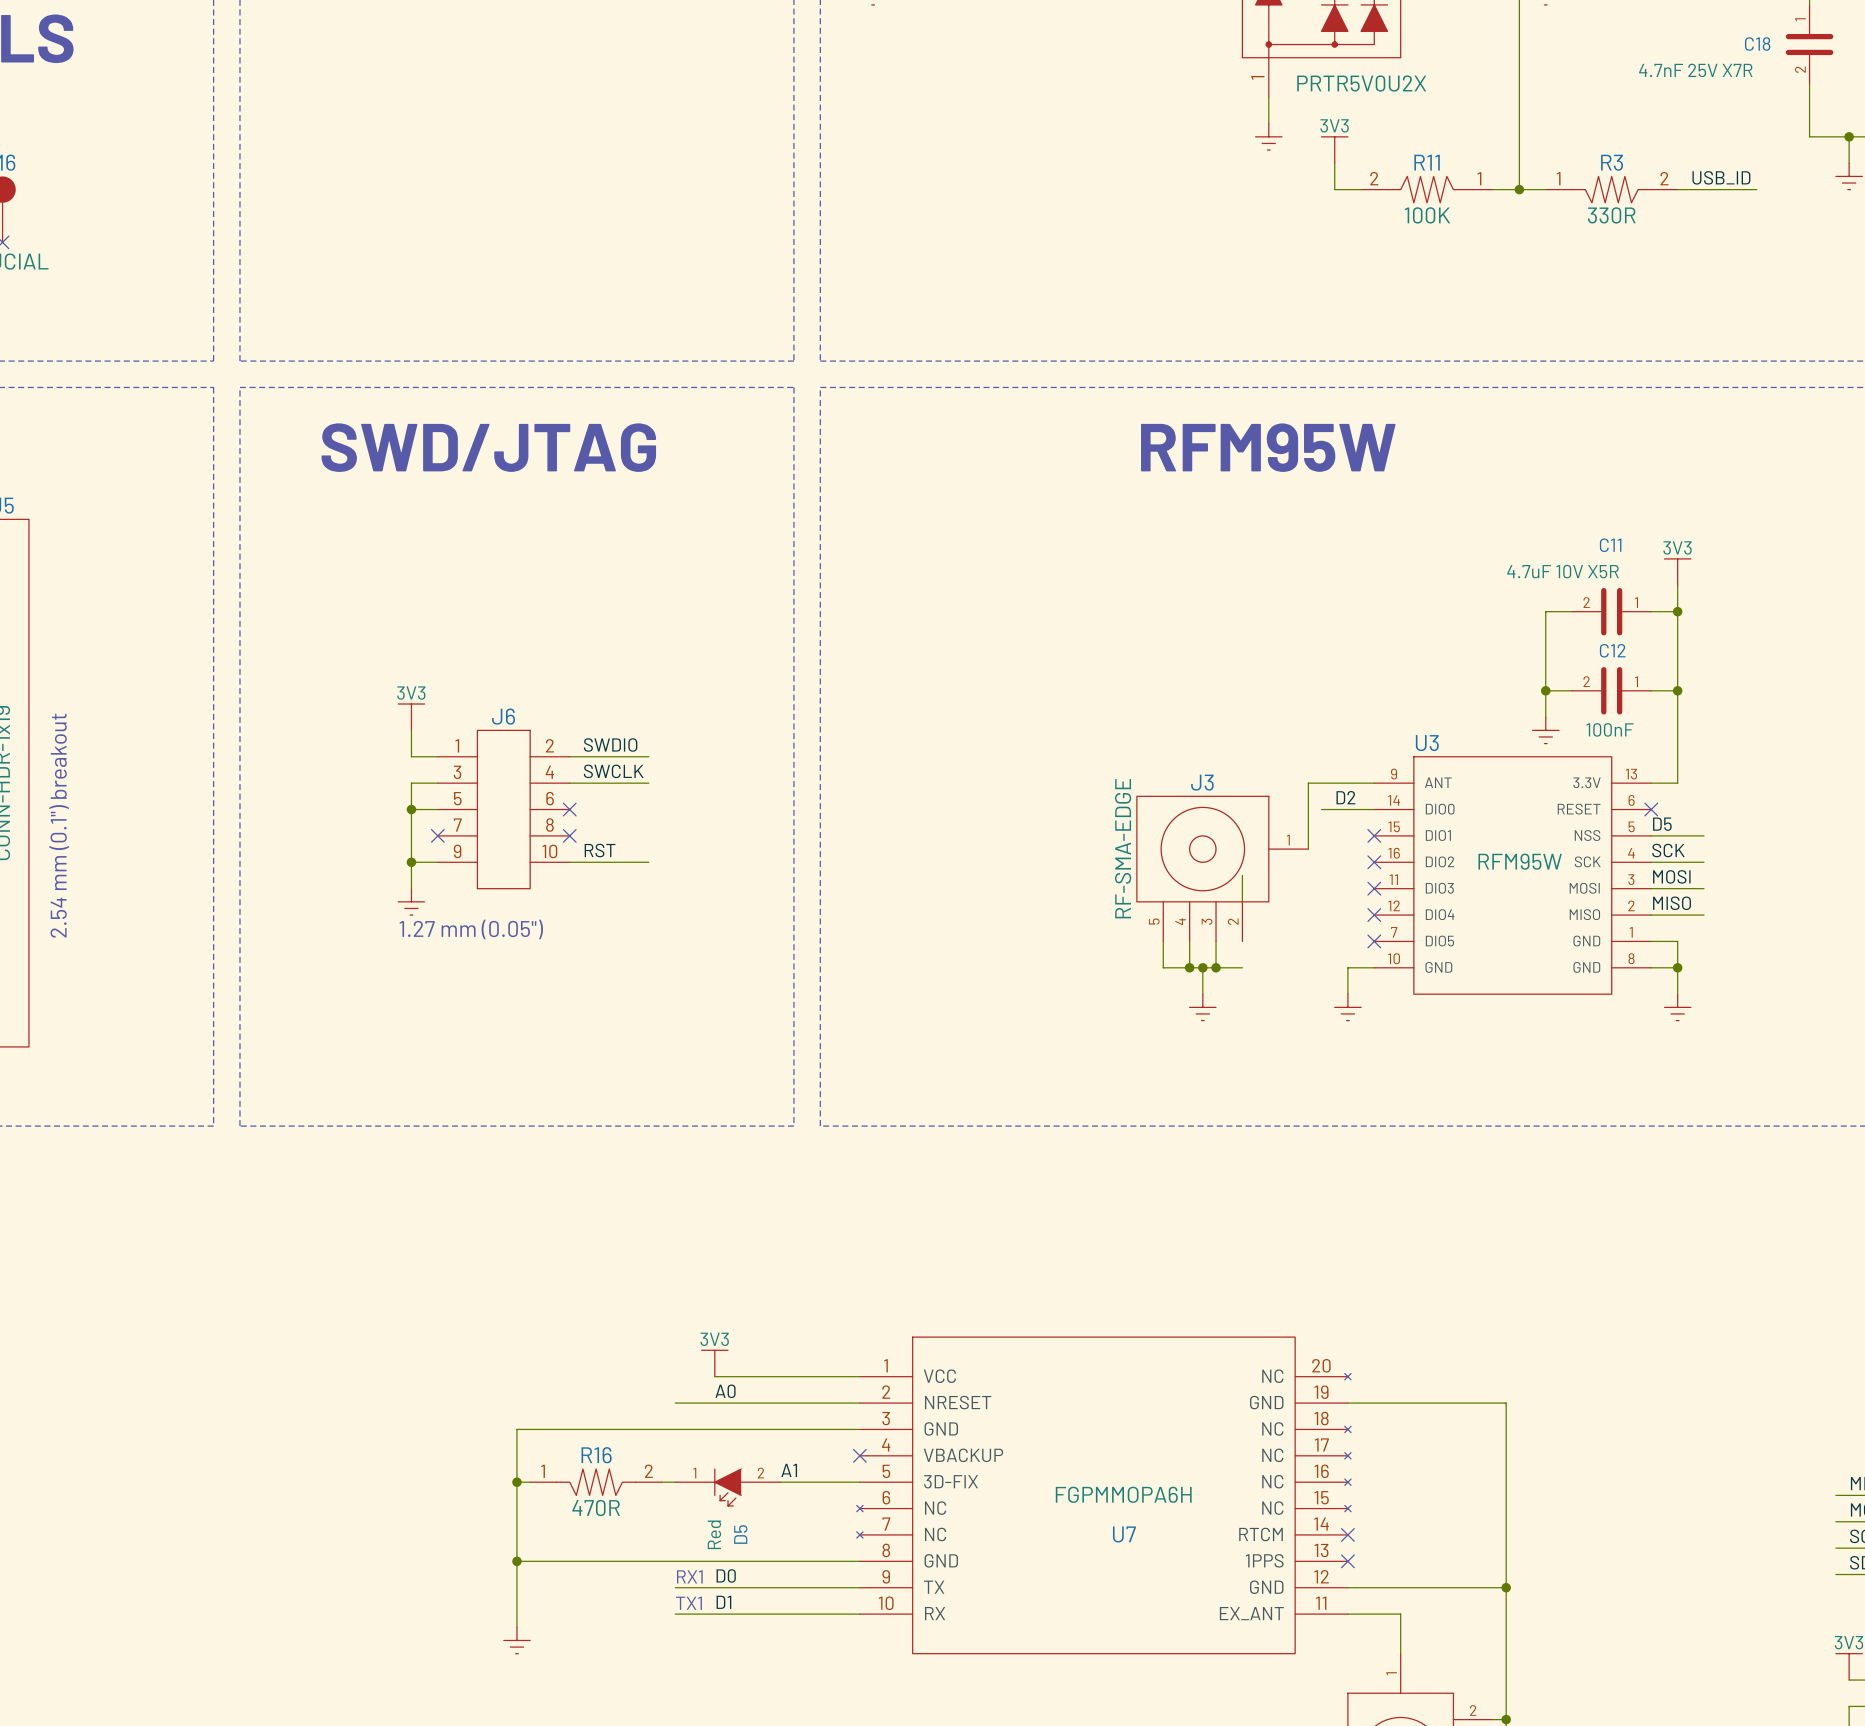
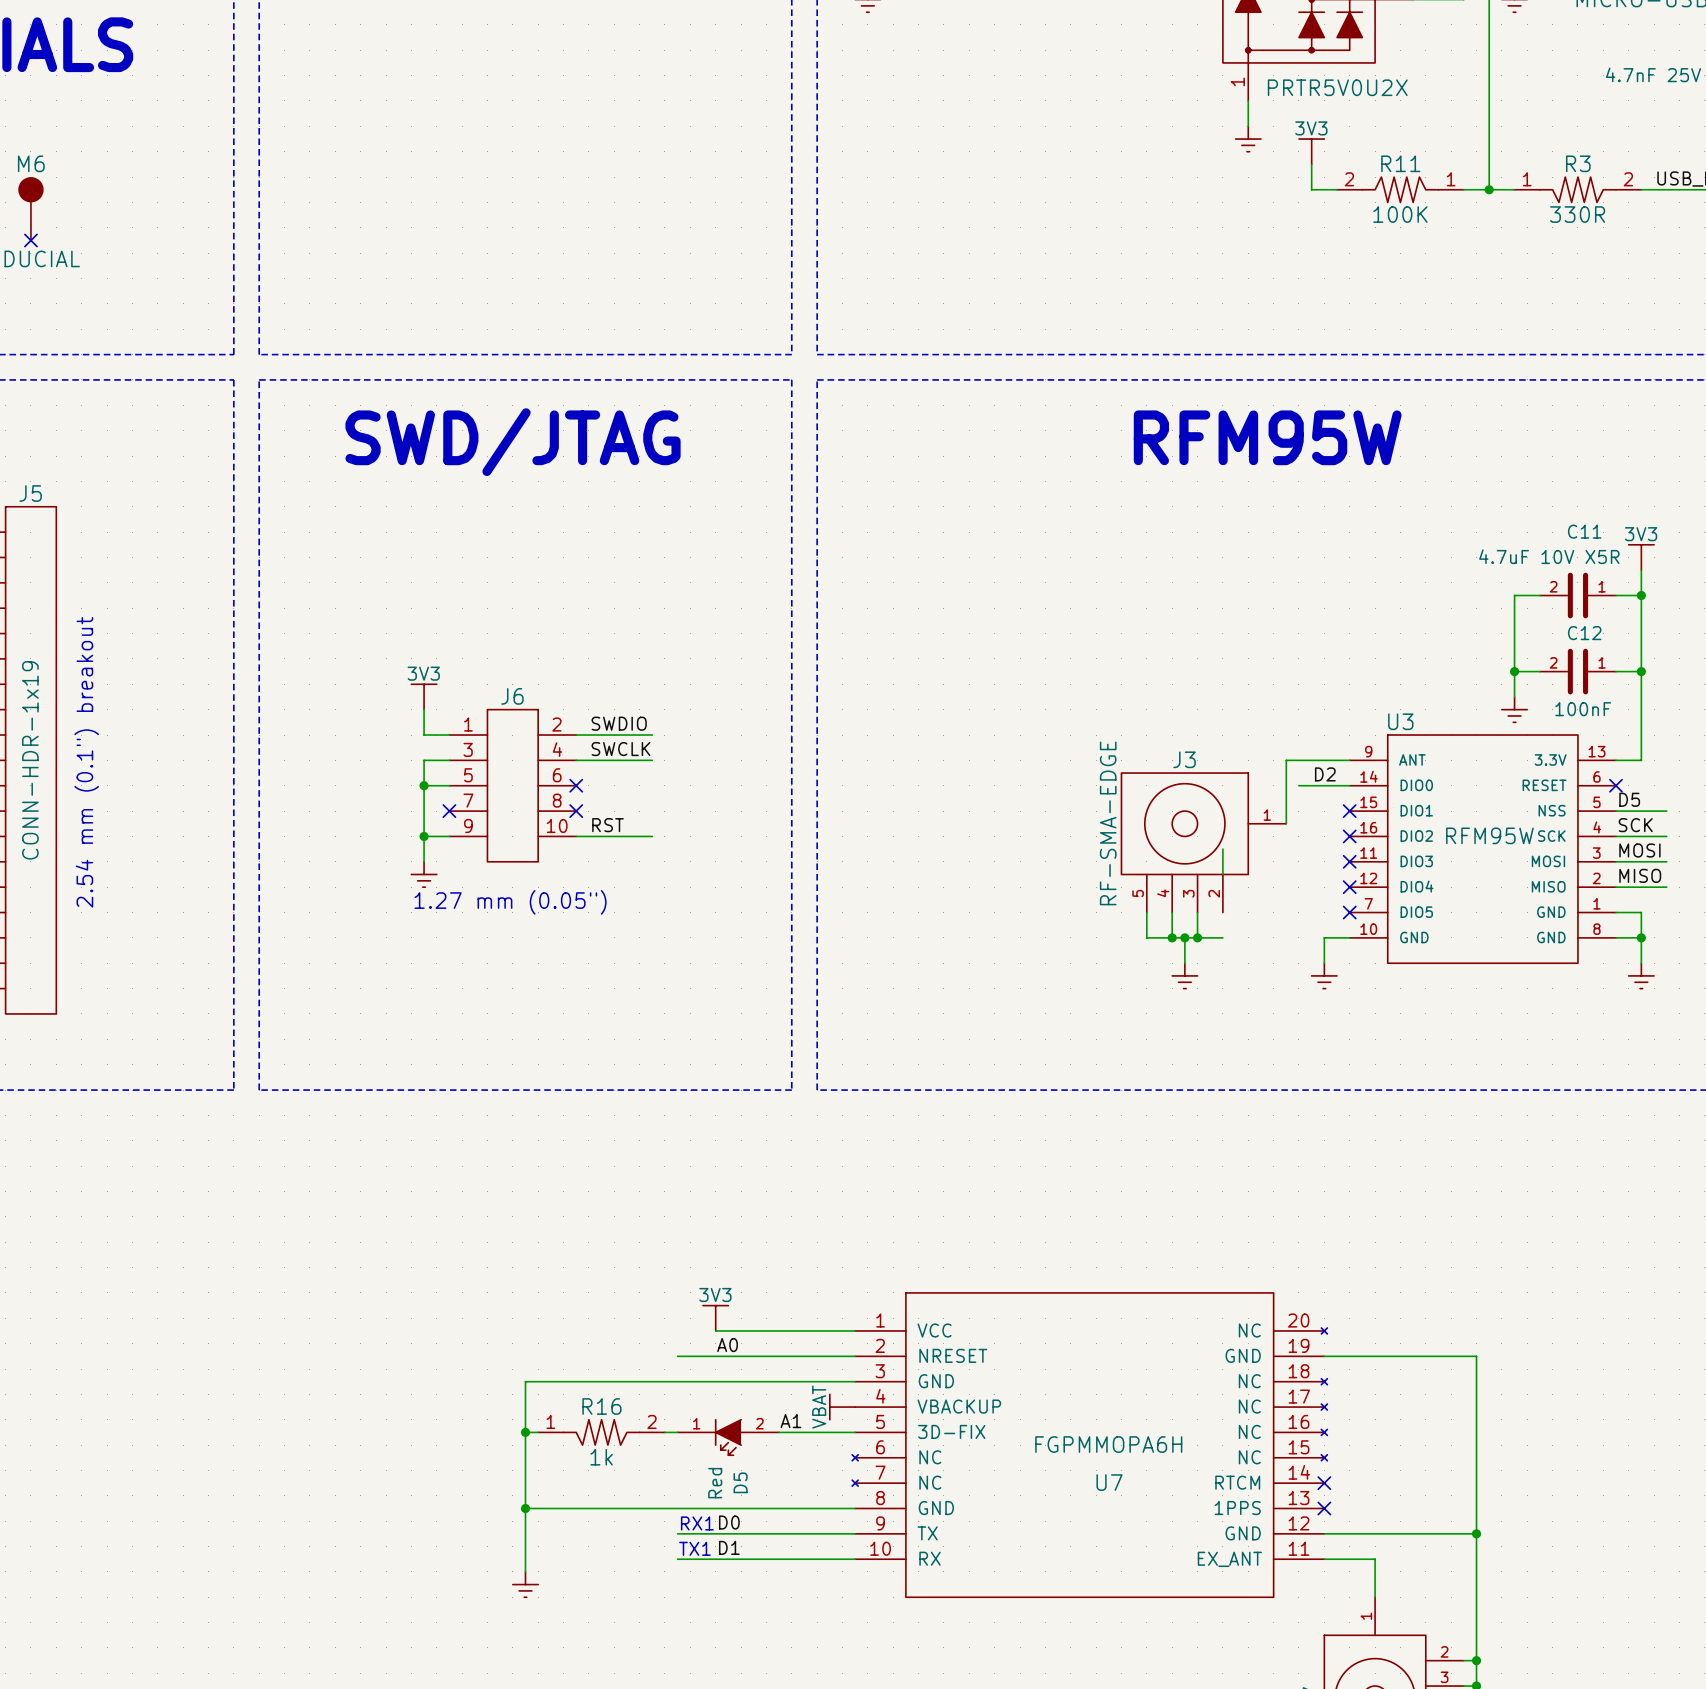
power symbol: none -> VBAT (842, 1407)
no-connect mark: (859, 1455) -> none
R16 value: 470R (596, 1507) -> 1k (601, 1457)

